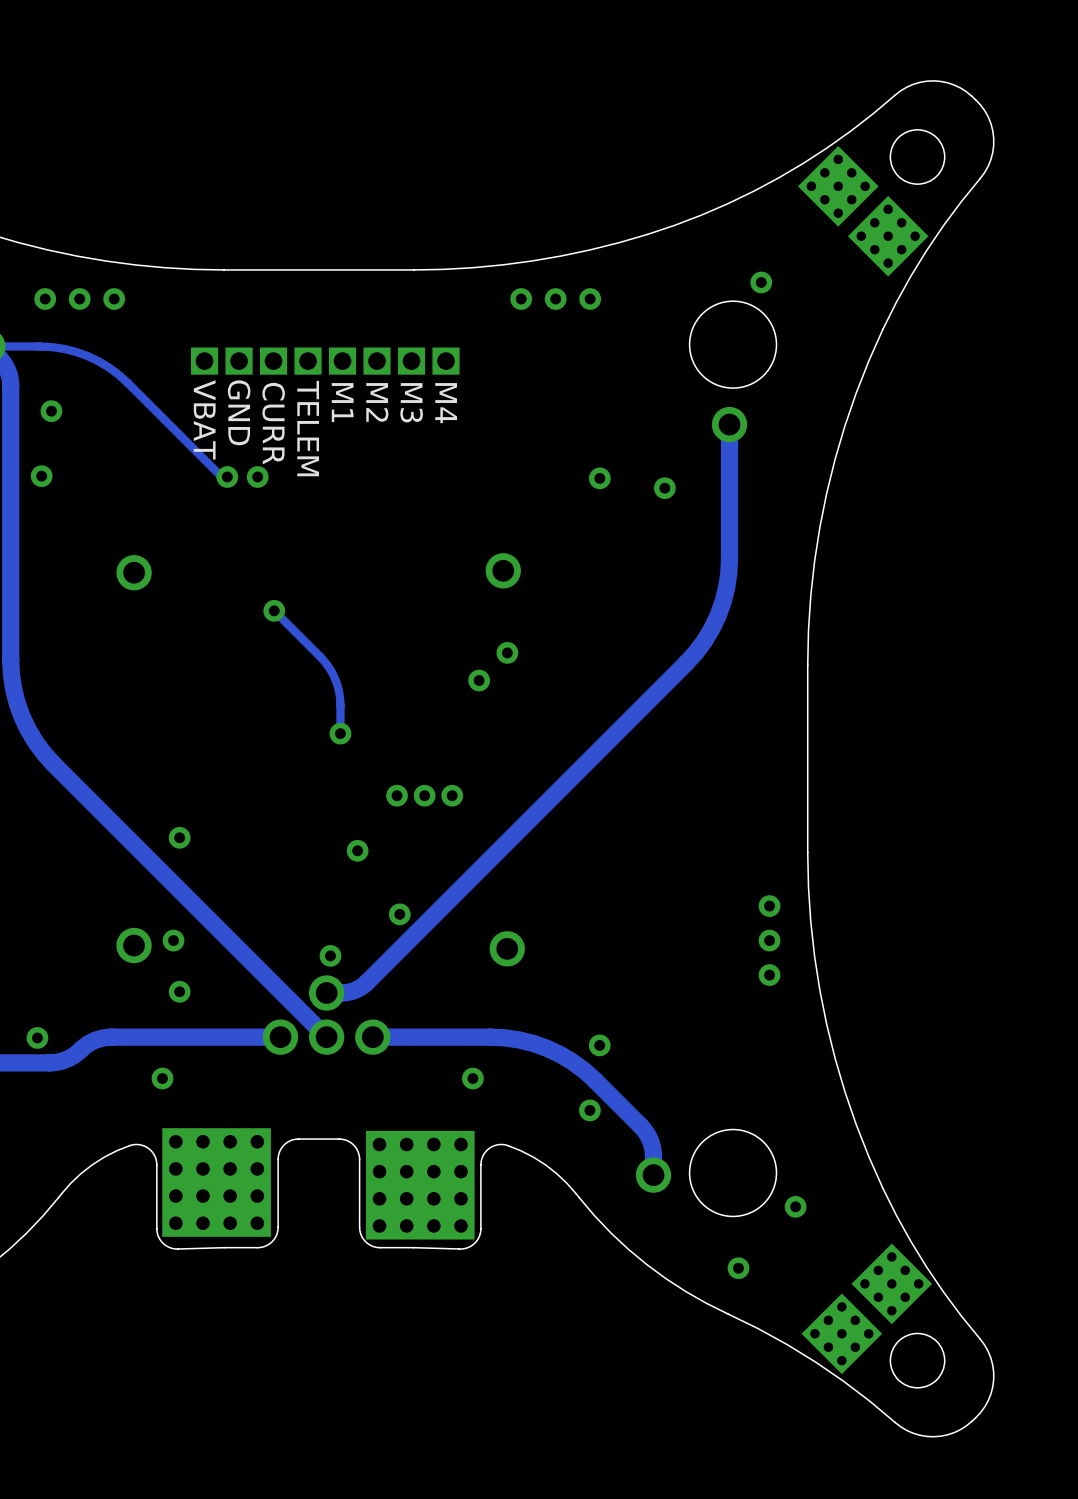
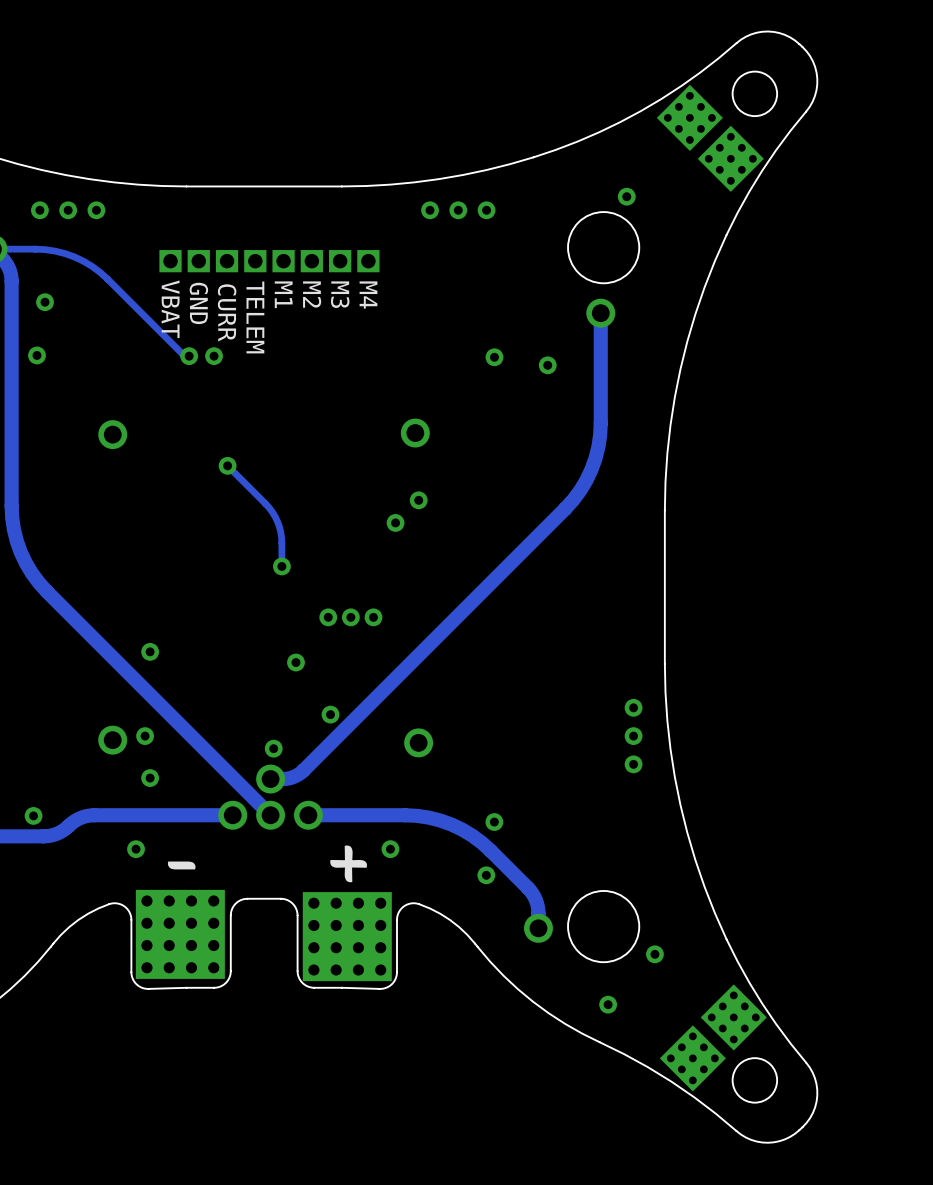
drawing: none -> [330, 845, 367, 883]
drawing: none -> [167, 861, 196, 870]

